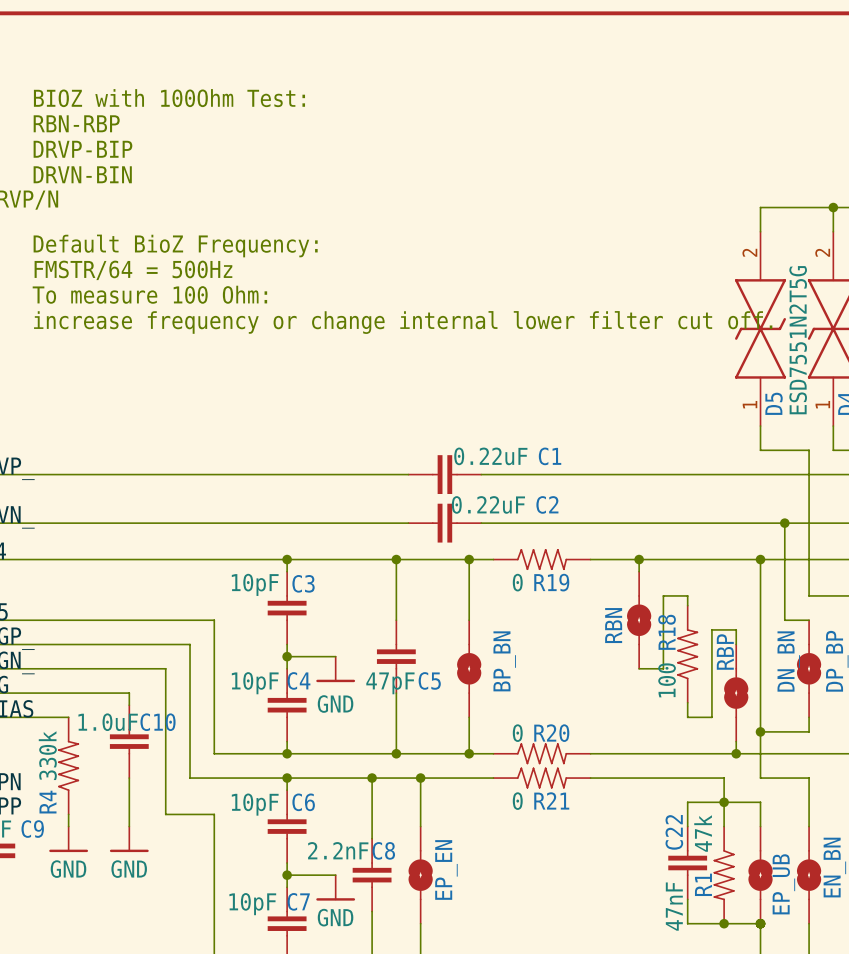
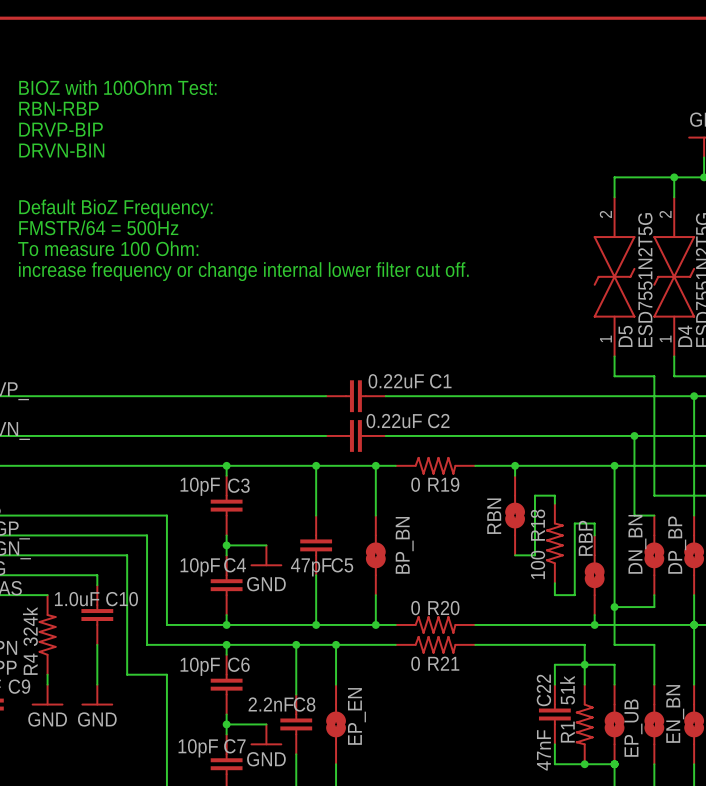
R4 value: 330k (47, 755) -> 324k (30, 626)
R1 value: 47k (703, 833) -> 51k (567, 690)

